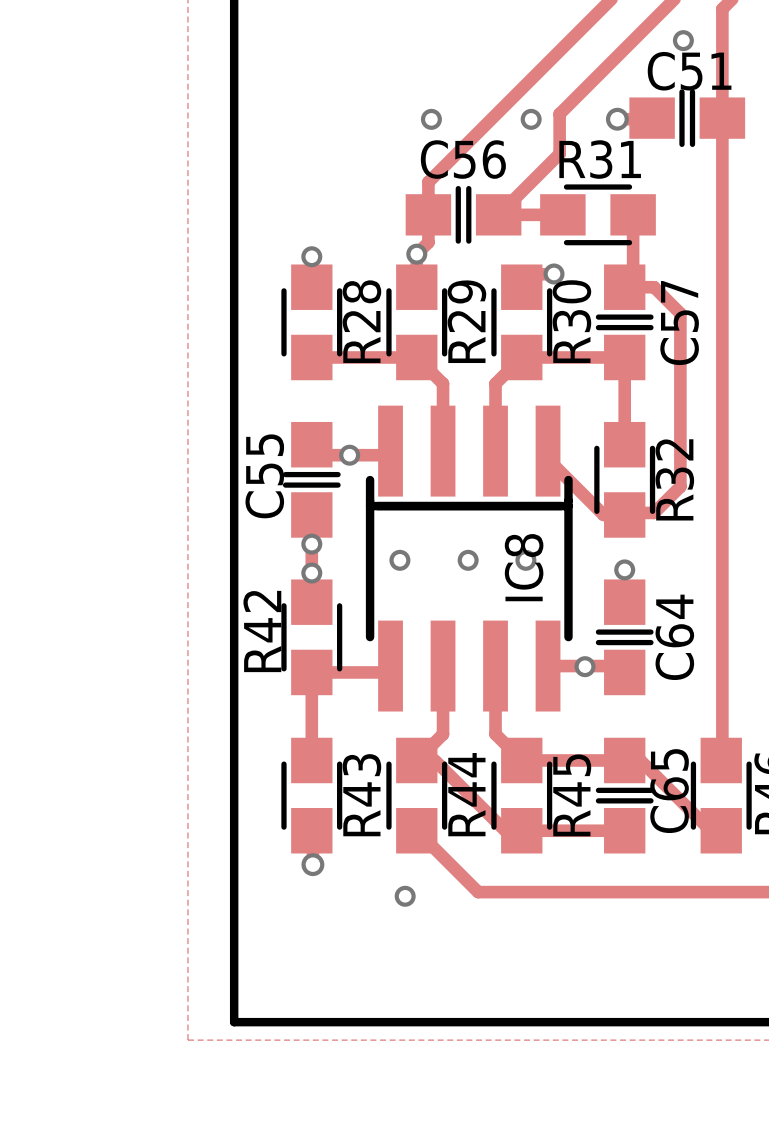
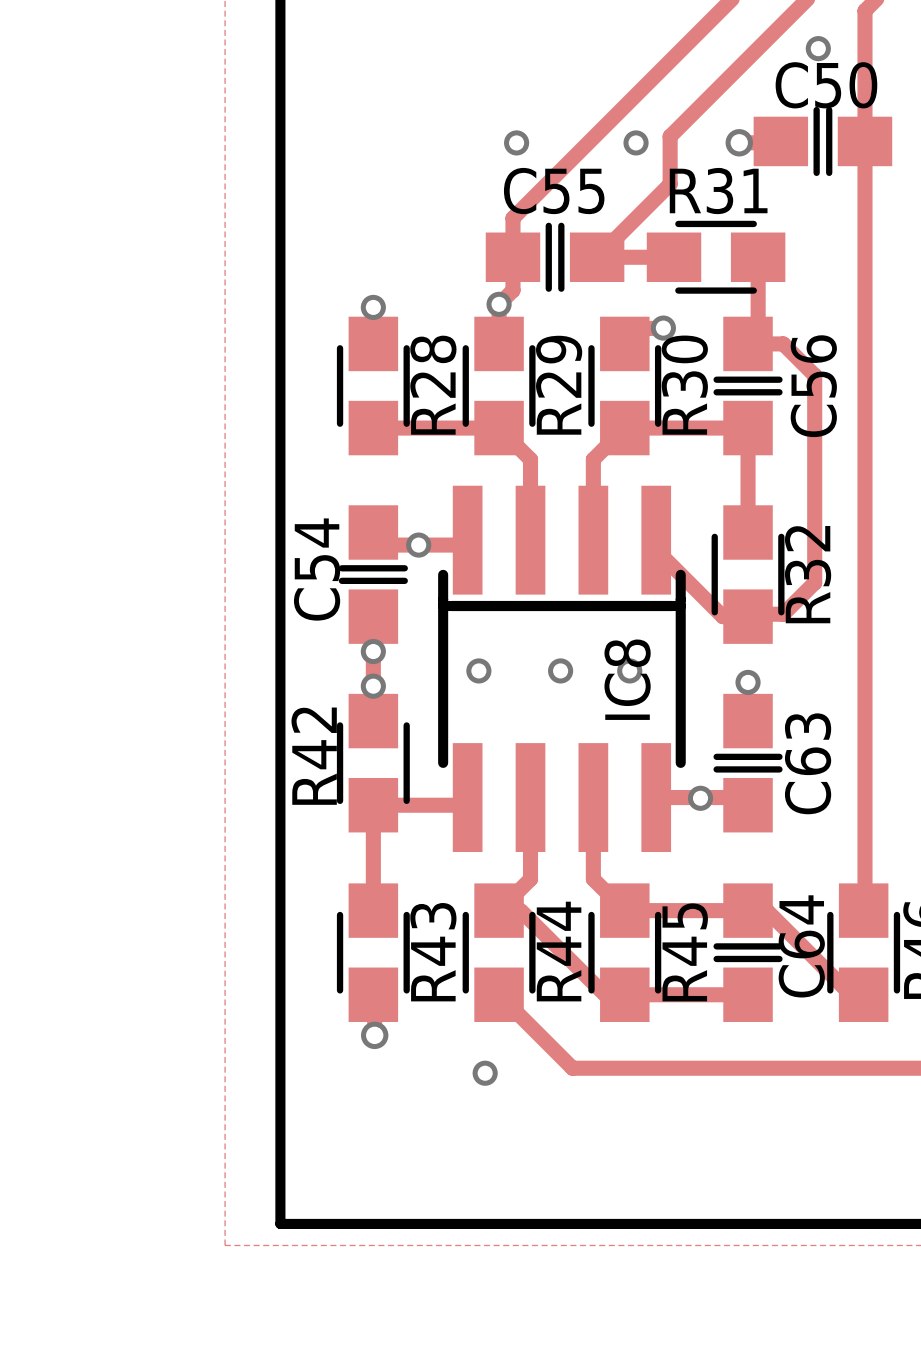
C51 name: C51 (689, 71) -> C50 (826, 85)
C56 name: C56 (463, 159) -> C55 (554, 191)
C57 name: C57 (679, 323) -> C56 (813, 386)
C55 name: C55 (264, 476) -> C54 (317, 569)
C64 name: C64 (674, 637) -> C63 (808, 763)
C65 name: C65 (669, 791) -> C64 (801, 946)

